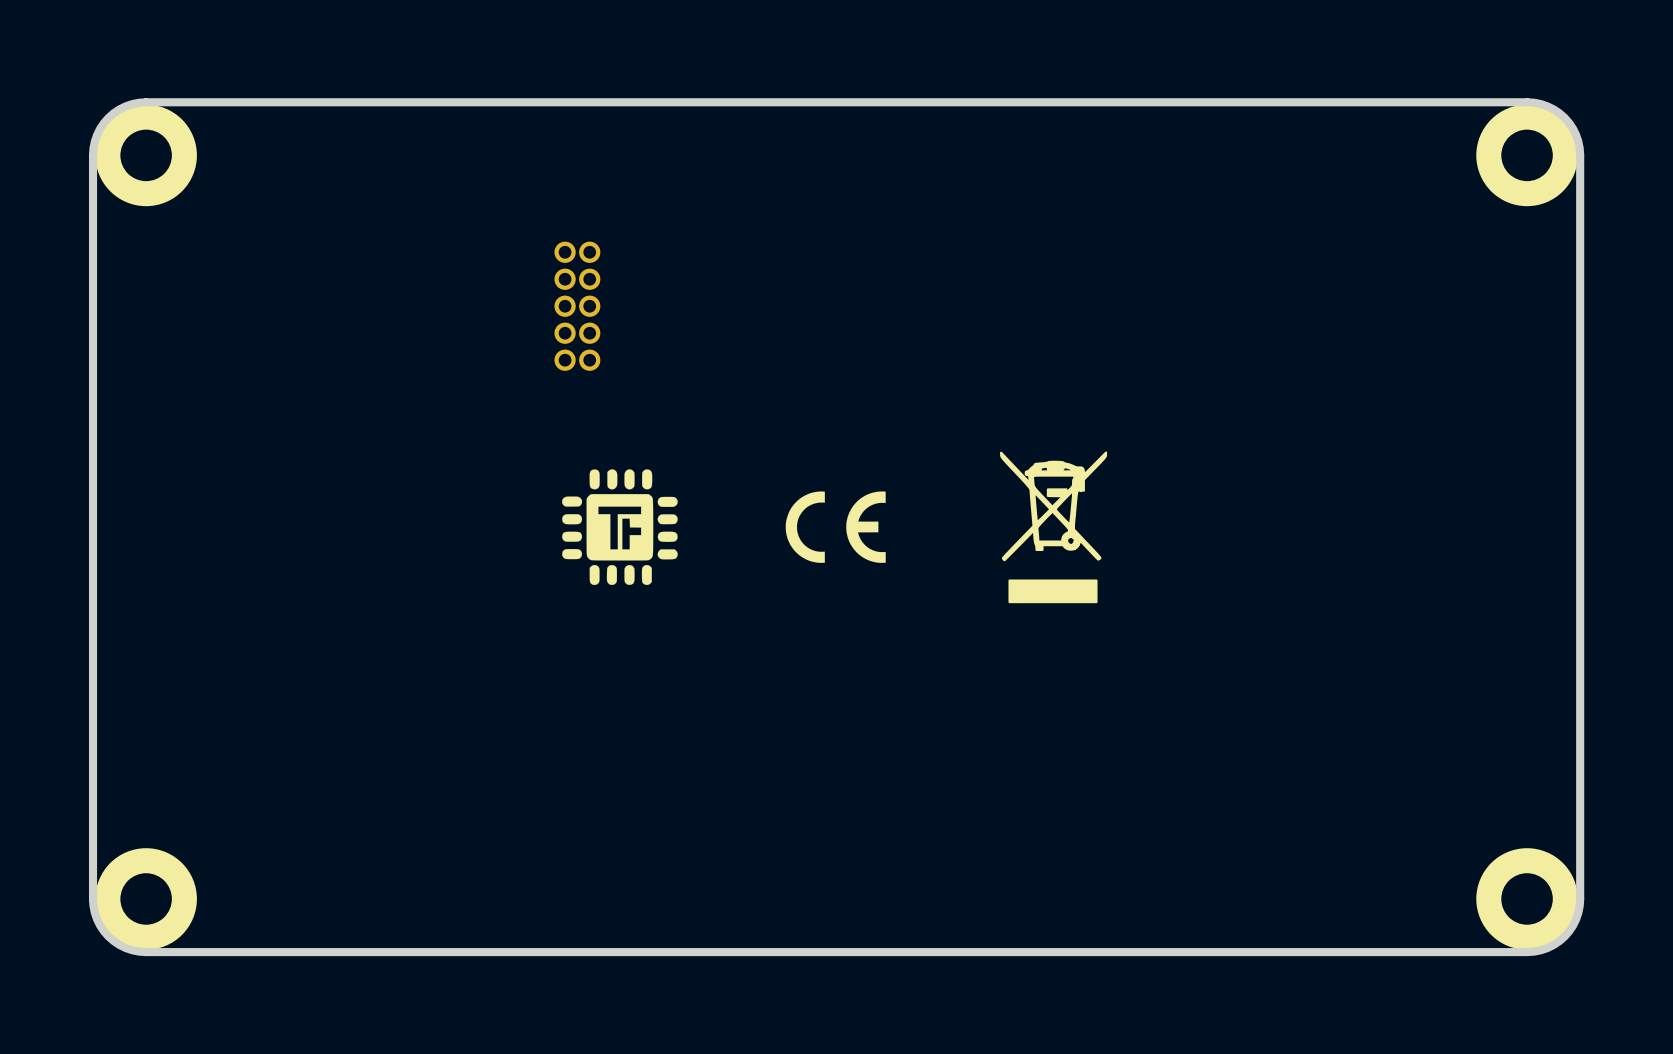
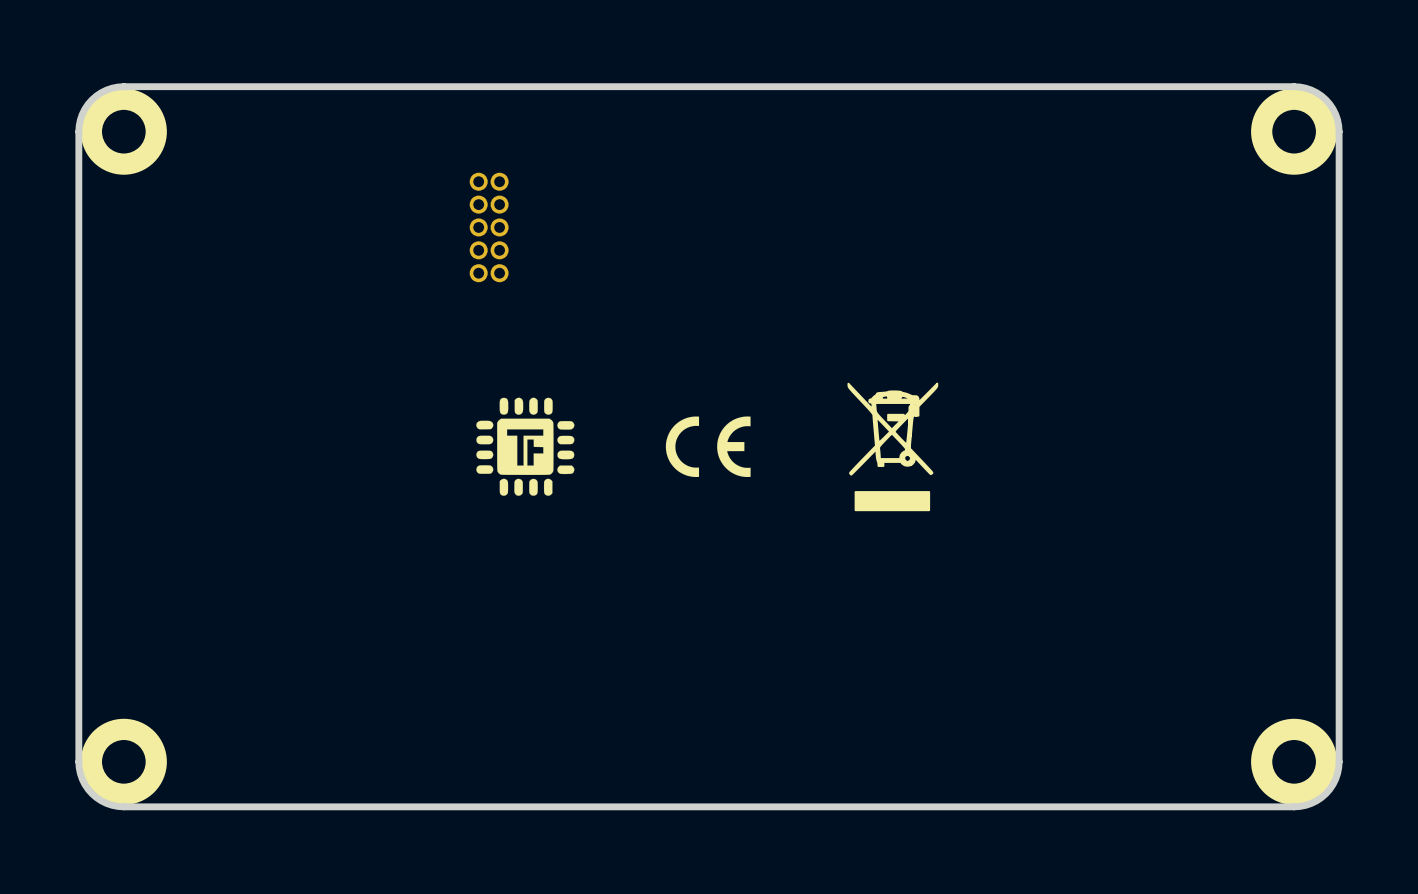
part position: (577, 306) -> (489, 227)

